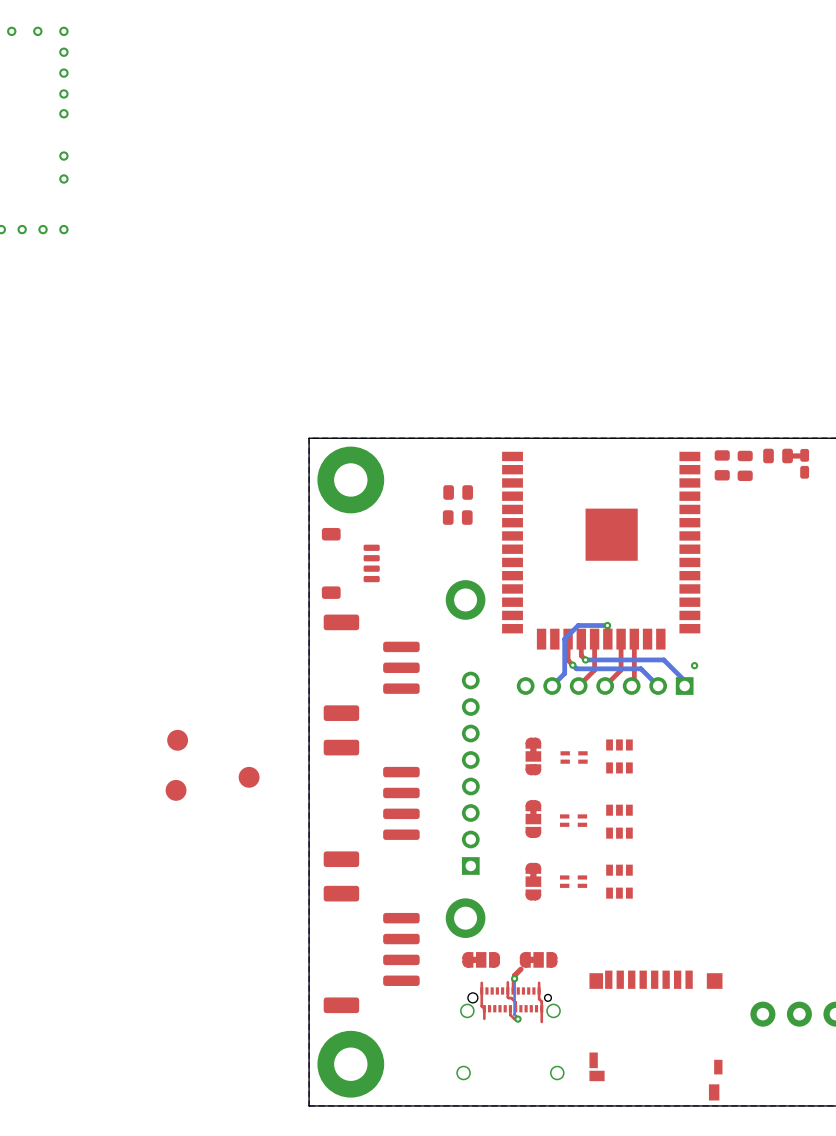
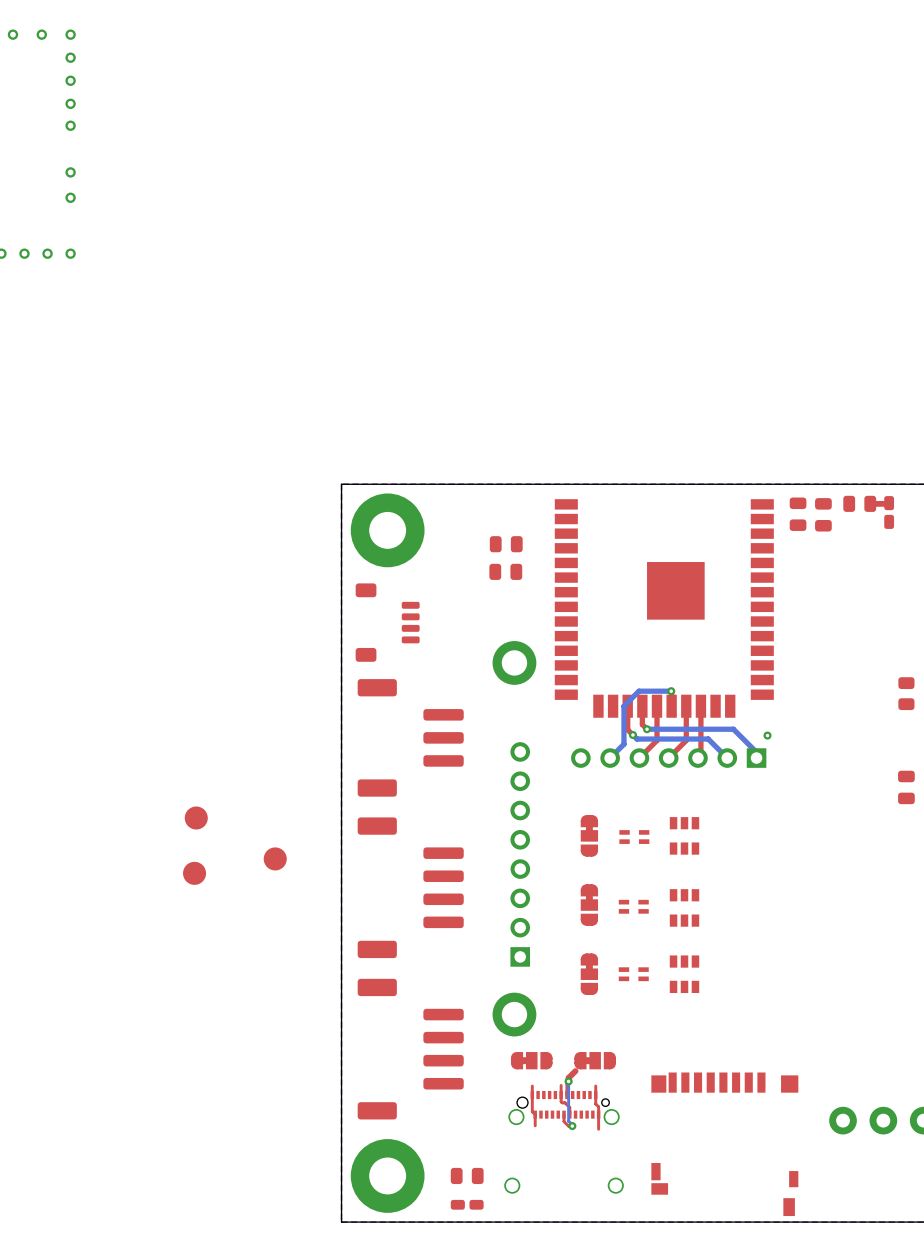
part: none -> (906, 693)
part: none -> (906, 787)
part: none -> (467, 1175)
part: none -> (467, 1204)

